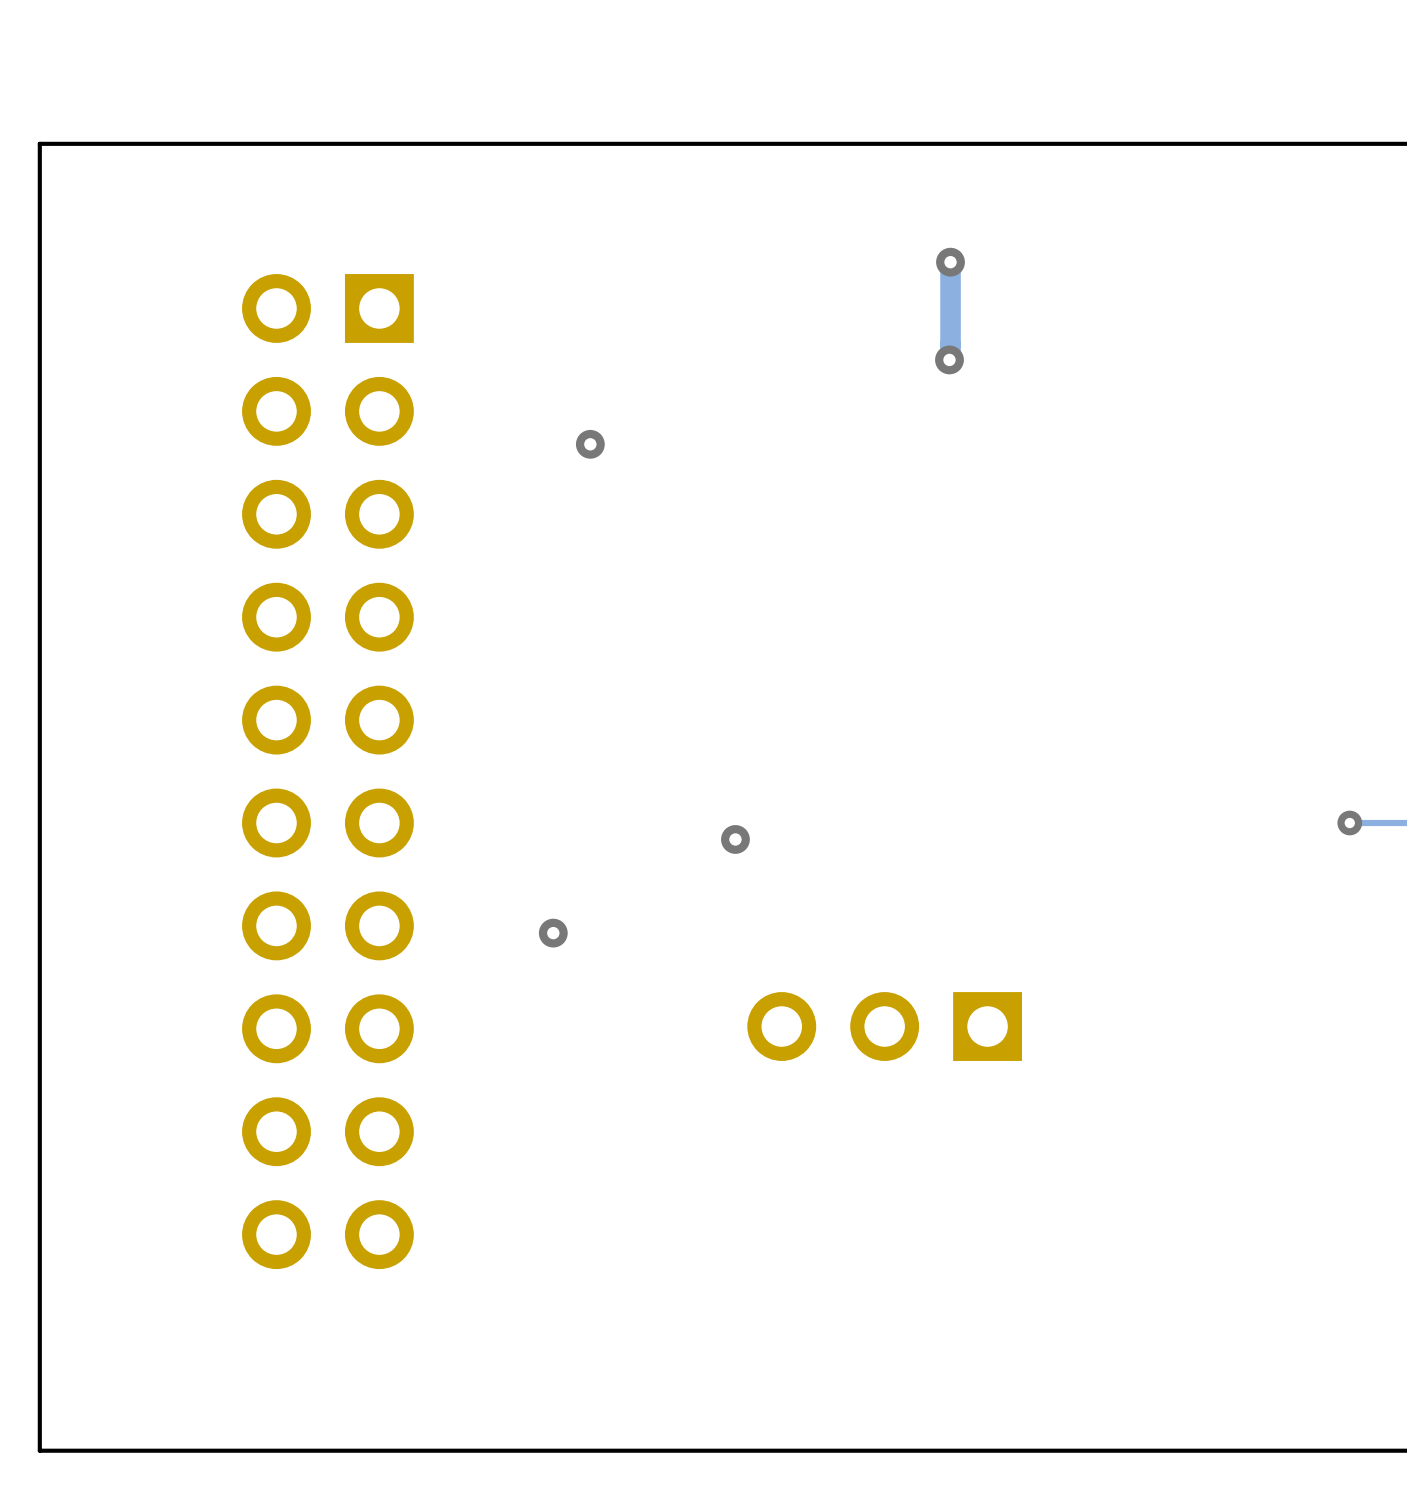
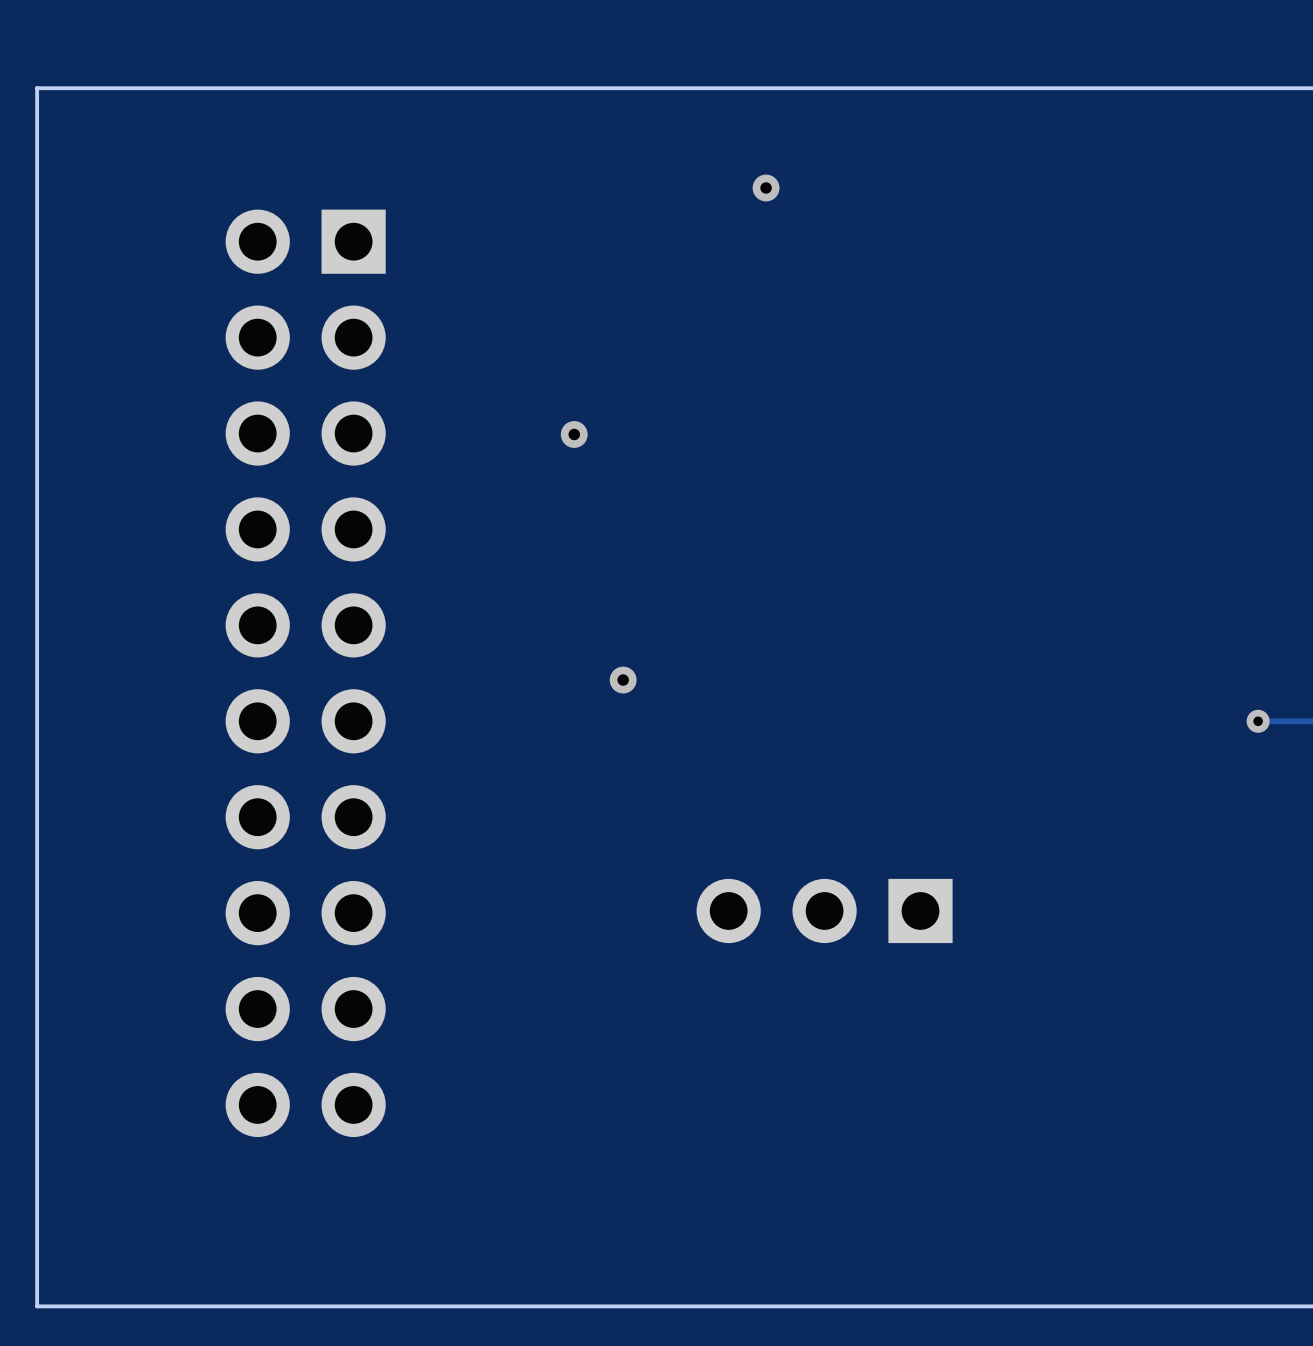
via: none -> (766, 187)
track: (950, 262) (949, 359) -> none
via: (950, 262) -> none
via: (949, 359) -> none
via position: (590, 444) -> (574, 434)
via position: (735, 839) -> (623, 680)
via: (553, 933) -> none

